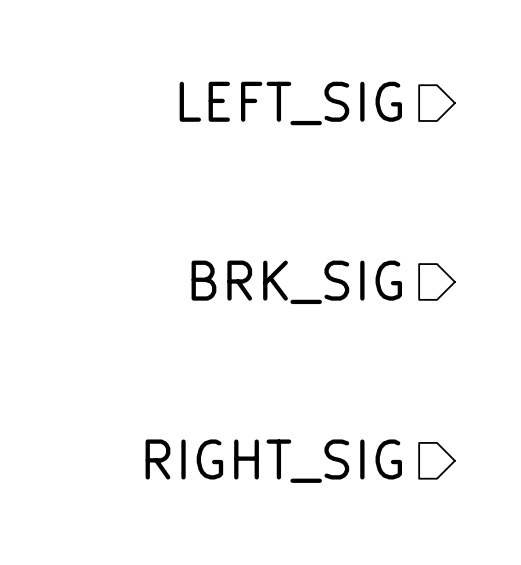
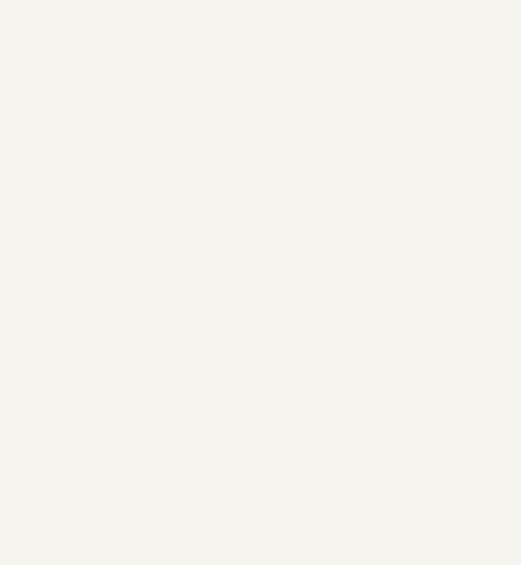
hierarchical label: LEFT_SIG (290, 103) -> none
hierarchical label: BRK_SIG (296, 282) -> none
hierarchical label: RIGHT_SIG (273, 461) -> none

